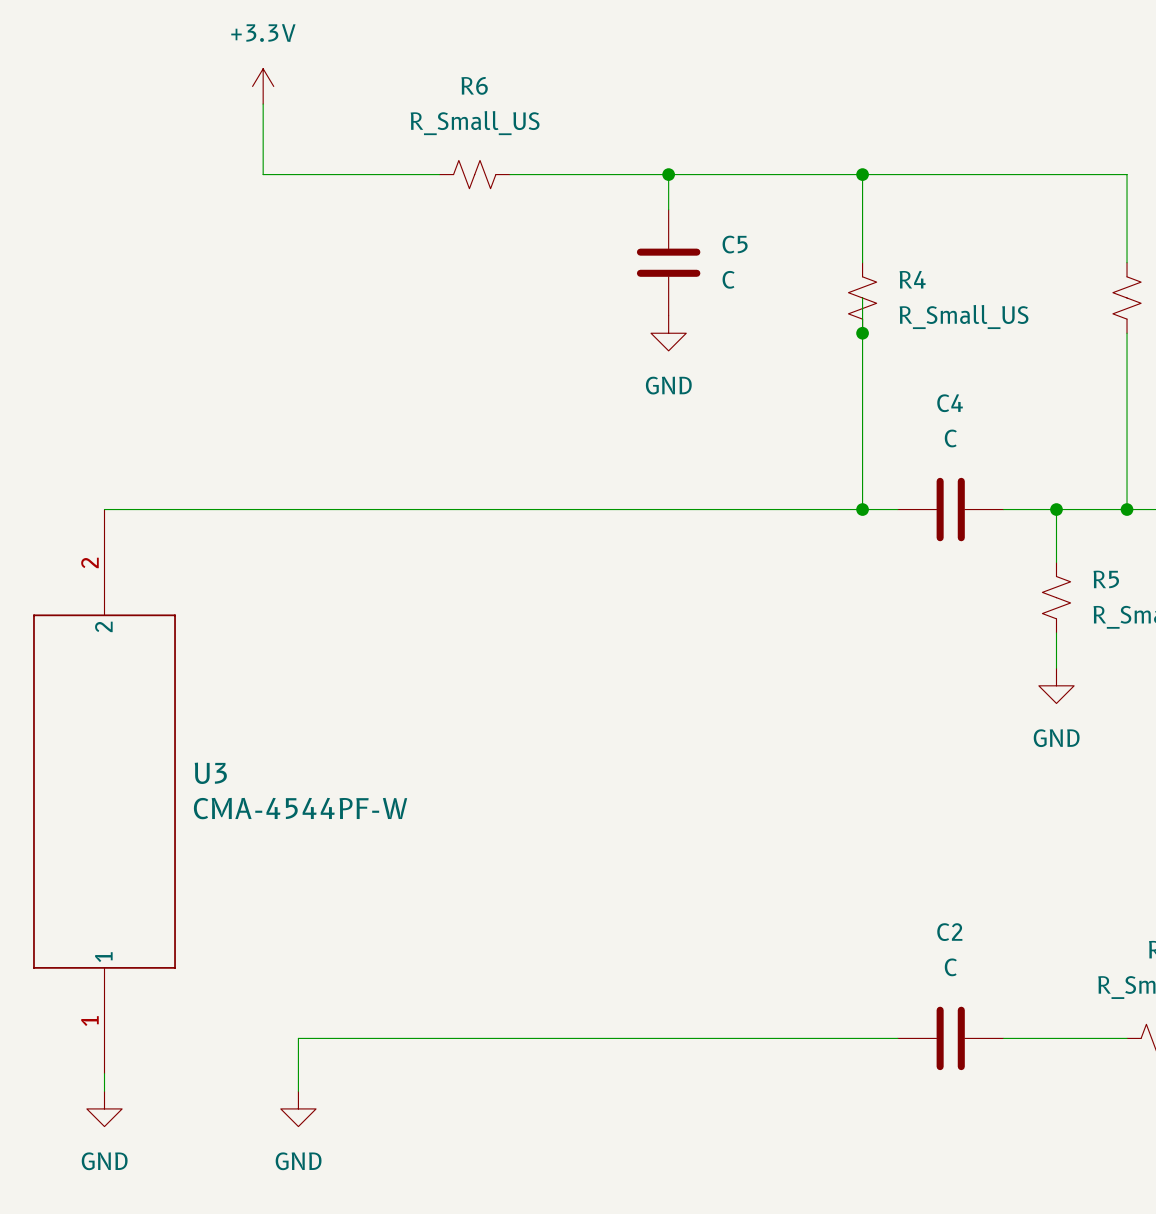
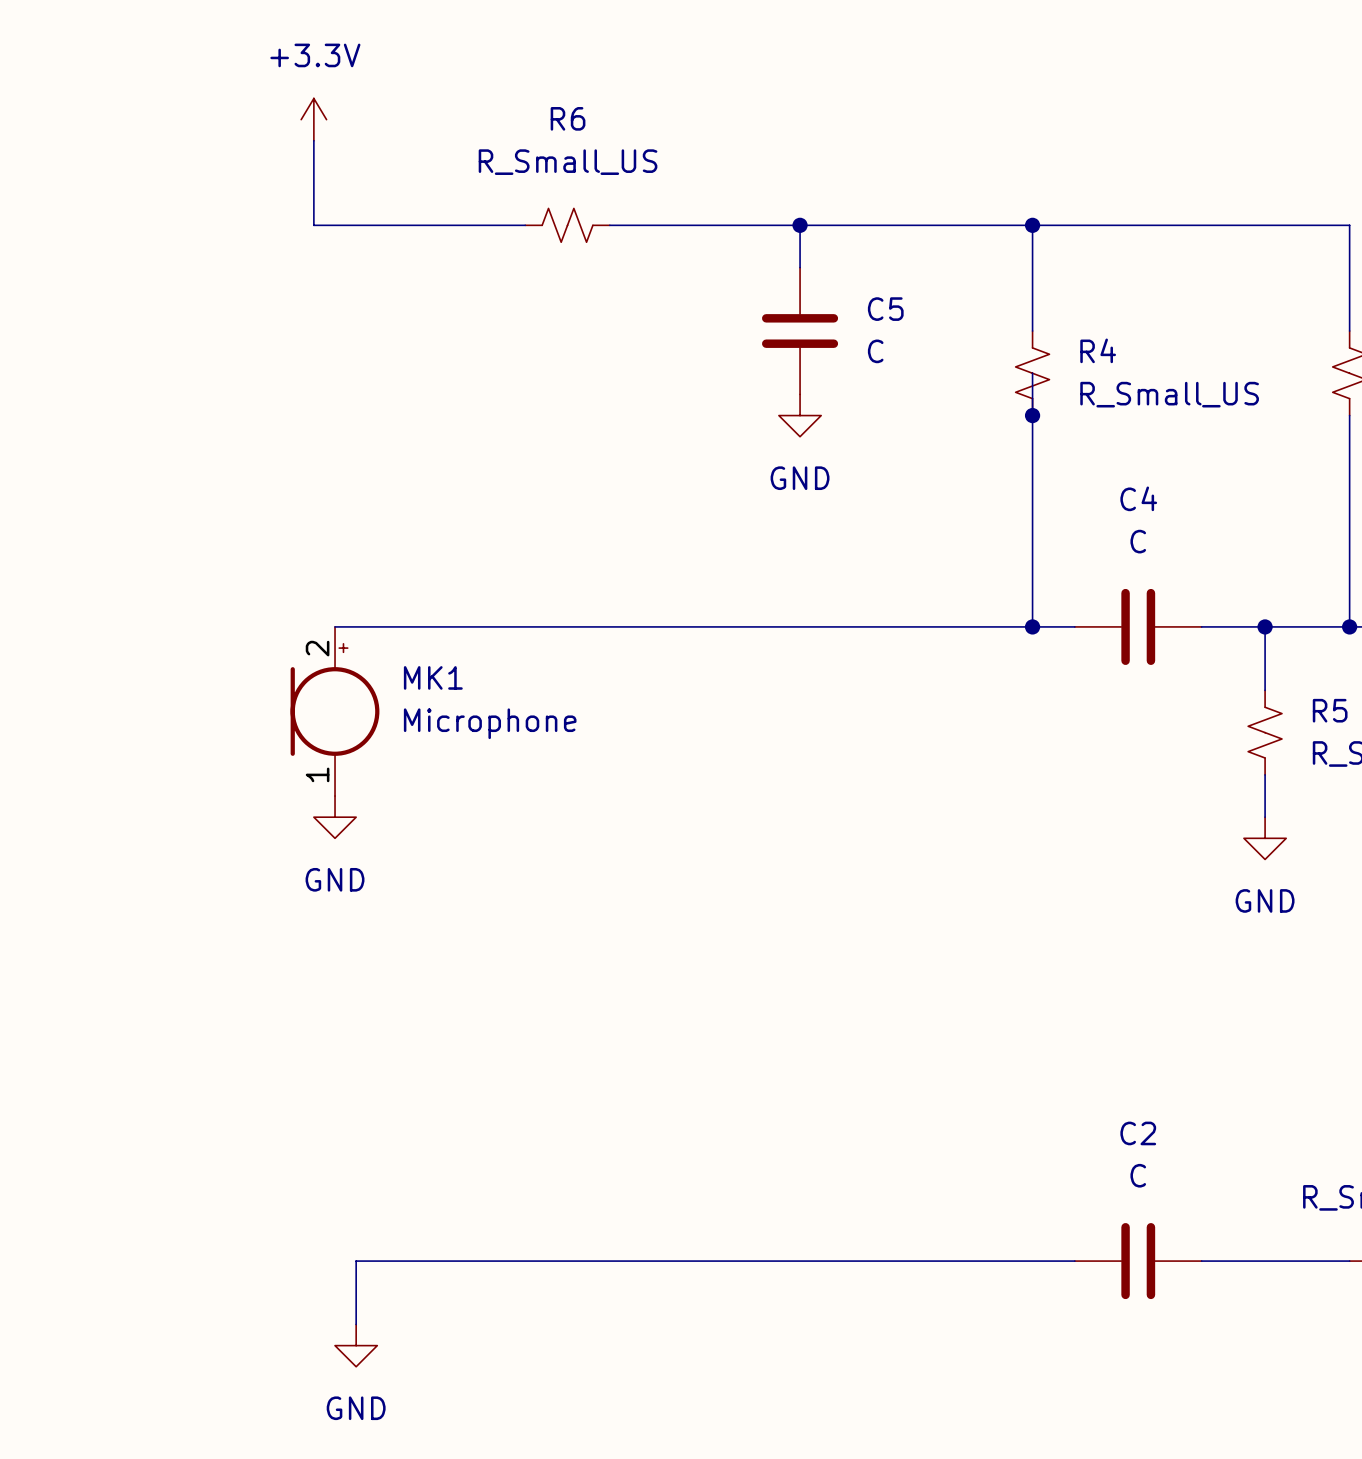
wire: (104, 509) (280, 509) -> none
MK1: none -> Microphone (335, 711)
power symbol: none -> GND (335, 817)
U3: CMA-4544PF-W (104, 791) -> none
wire: (104, 1073) (104, 1091) -> none
power symbol: GND (104, 1108) -> none

